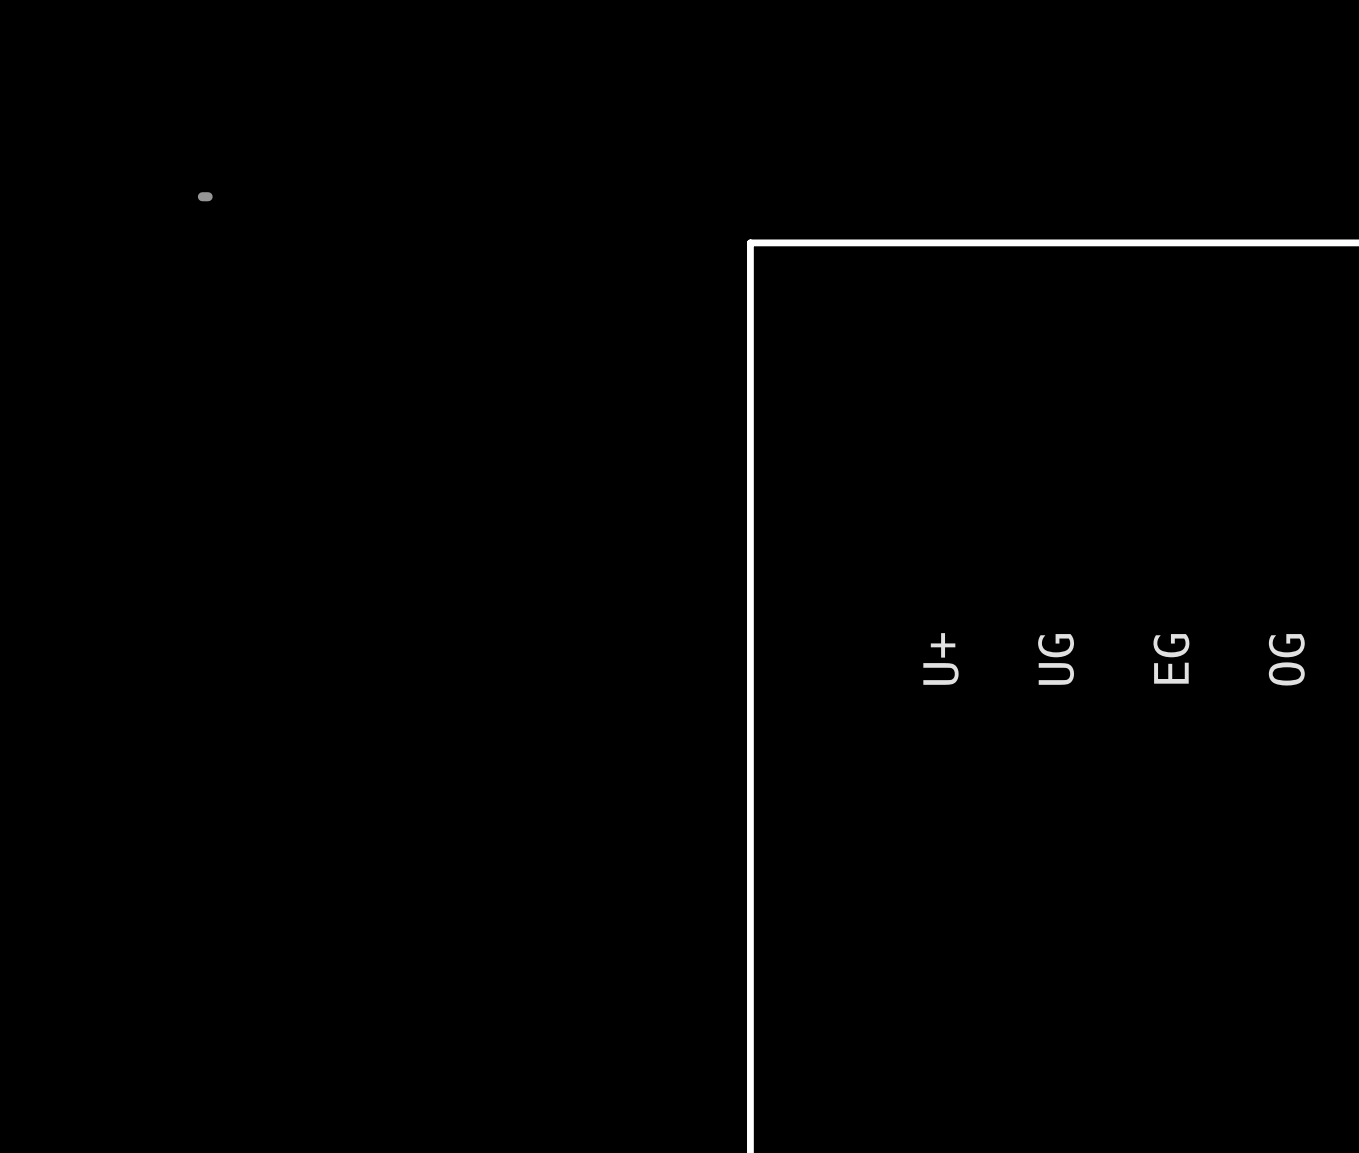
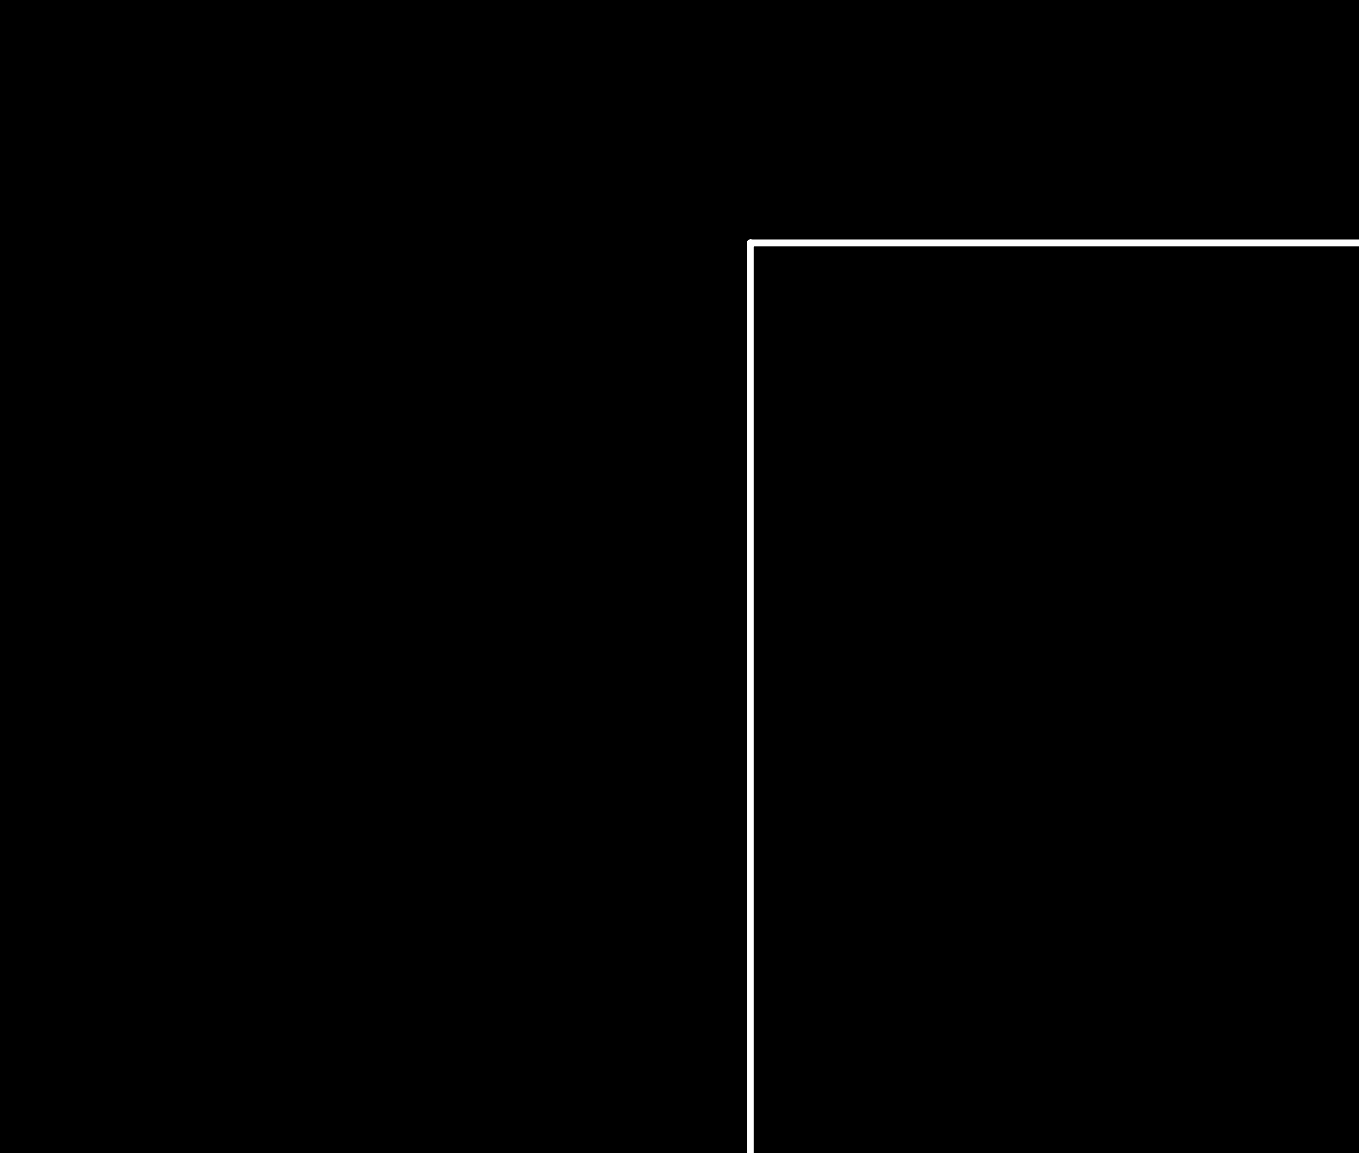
line: (202, 196) (208, 196) -> none
text: U+ (940, 658) -> none
text: EG (1171, 658) -> none
text: UG (1056, 659) -> none
text: OG (1286, 659) -> none

